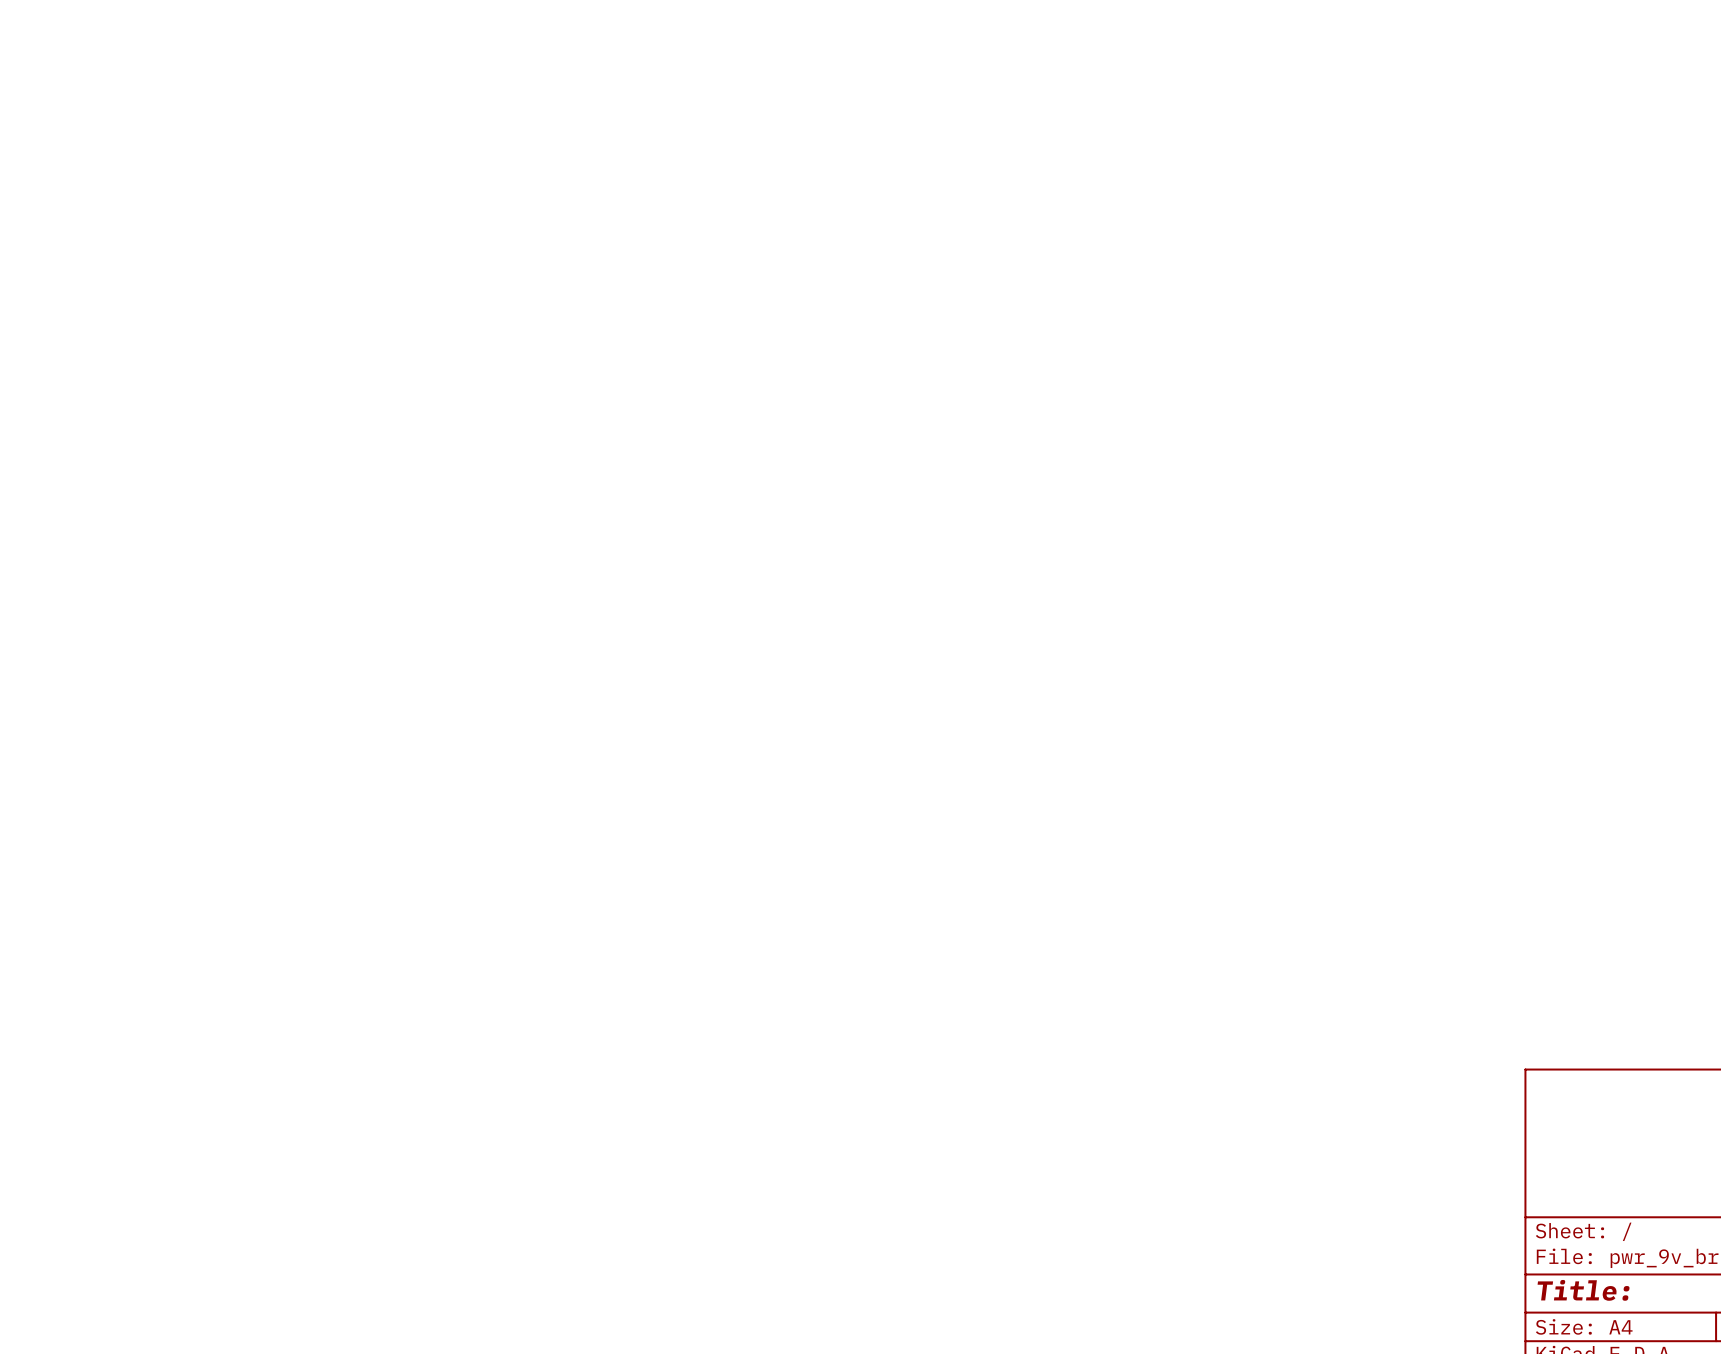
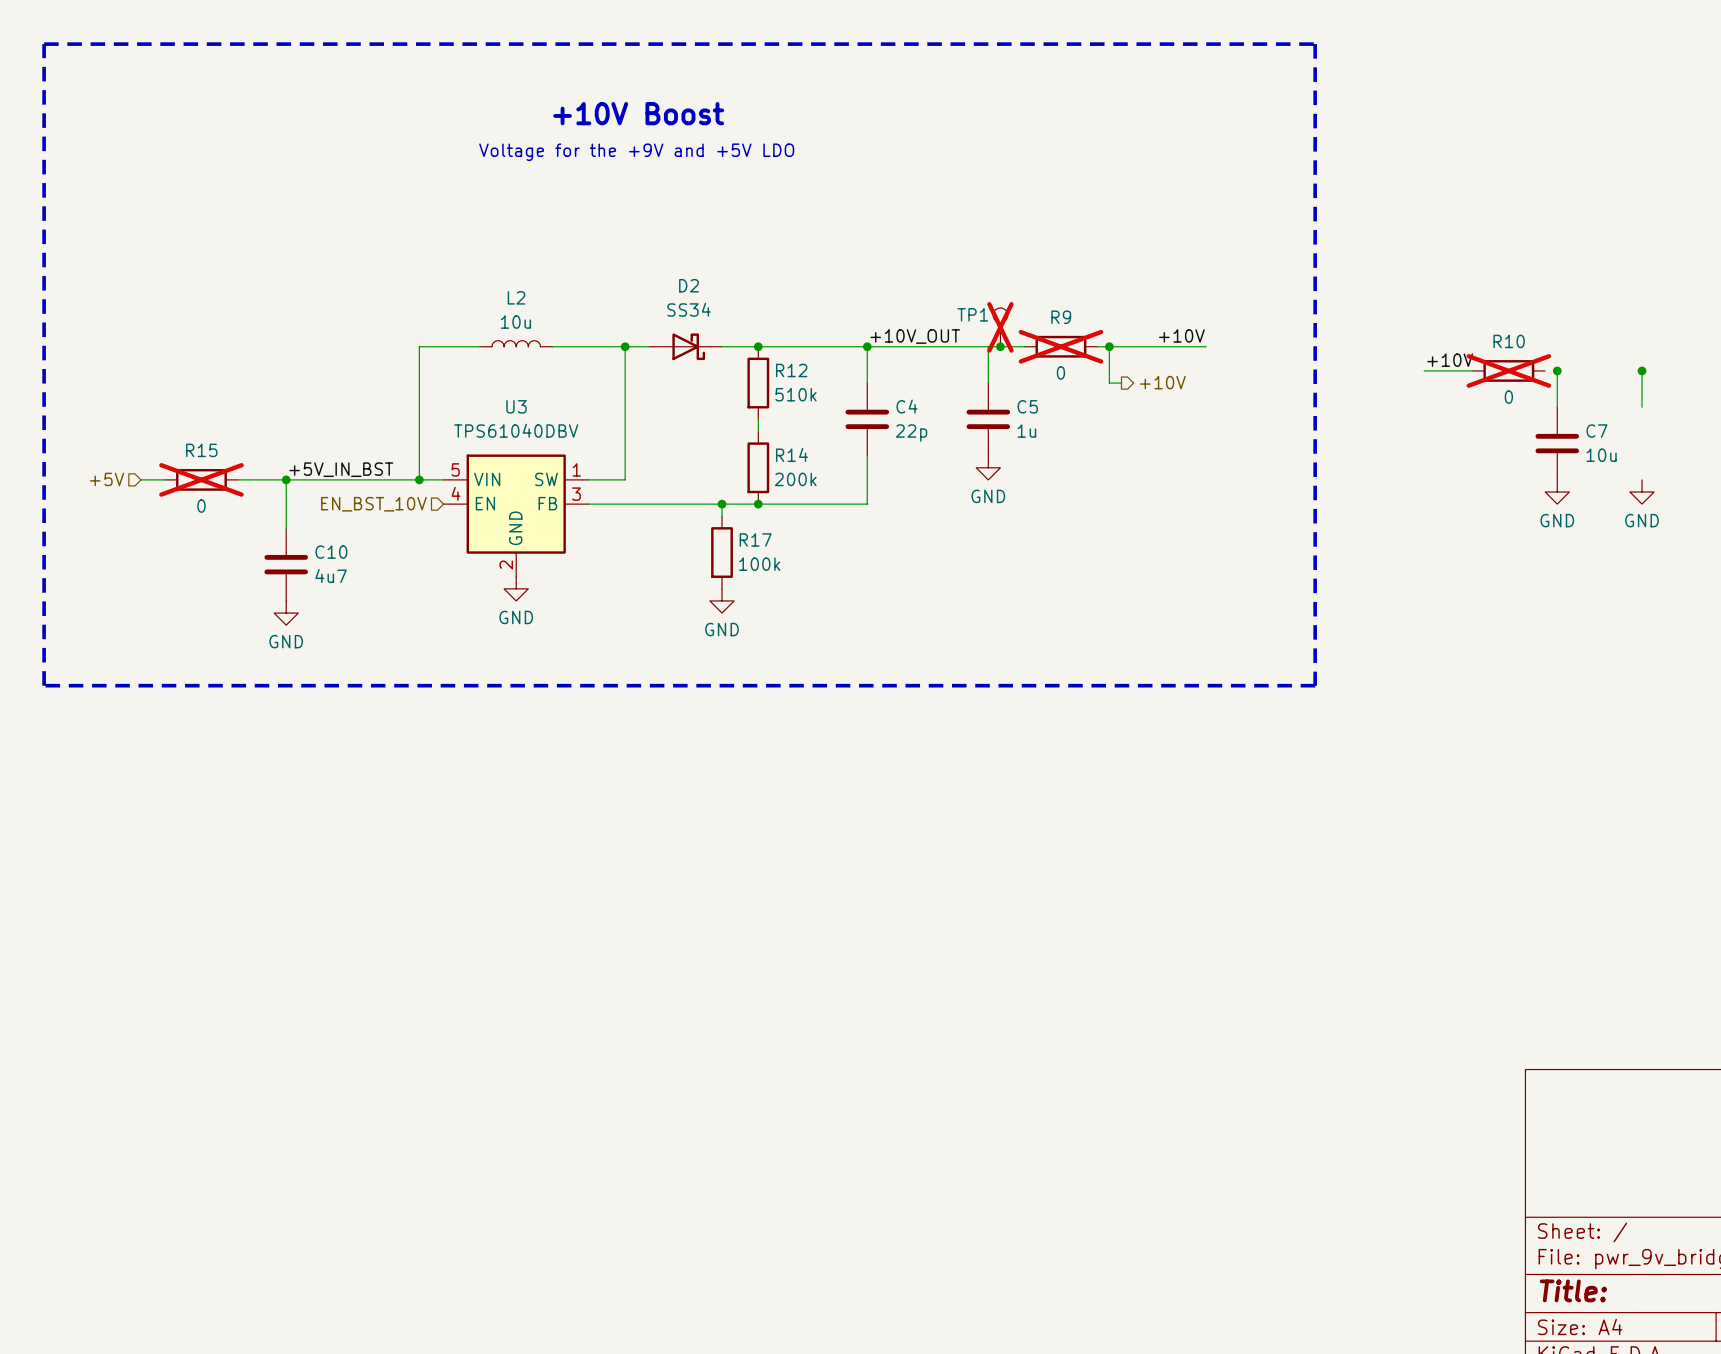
line: none -> (44, 44) (1315, 44) (1315, 685) (44, 685) (44, 44)
text: none -> +10V Boost (638, 113)
text: none -> Voltage for the +9V and +5V LDO (636, 152)
TP1: none -> (1000, 327)
label: none -> +10V (1181, 335)
label: none -> +10V_OUT (915, 336)
L2: none -> 10u (516, 343)
wire: none -> (479, 346) (419, 346) (419, 479)
wire: none -> (552, 346) (649, 346)
wire: none -> (625, 346) (625, 479) (588, 479)
junction: none -> (625, 346)
D2: none -> SS34 (685, 346)
wire: none -> (722, 346) (1024, 346)
junction: none -> (758, 346)
wire: none -> (867, 346) (867, 383)
junction: none -> (867, 346)
wire: none -> (988, 346) (988, 383)
junction: none -> (1000, 346)
R9: none -> 0 (1060, 346)
wire: none -> (1097, 346) (1206, 346)
wire: none -> (1109, 346) (1109, 383) (1121, 383)
junction: none -> (1109, 346)
label: none -> +10V (1450, 360)
wire: none -> (1424, 370) (1472, 370)
R10: none -> 0 (1508, 370)
wire: none -> (1557, 370) (1557, 407)
junction: none -> (1557, 370)
wire: none -> (1642, 370) (1642, 407)
junction: none -> (1642, 370)
hierarchical label: none -> +10V (1162, 382)
R12: none -> 510k (758, 383)
wire: none -> (758, 419) (758, 431)
C4: none -> 22p (867, 419)
C5: none -> 1u (988, 419)
C7: none -> 10u (1557, 443)
wire: none -> (867, 455) (867, 504) (588, 504)
R14: none -> 200k (758, 467)
power symbol: none -> GND (988, 467)
label: none -> +5V_IN_BST (341, 469)
hierarchical label: none -> +5V (107, 479)
wire: none -> (140, 479) (165, 479)
R15: none -> 0 (201, 479)
wire: none -> (237, 479) (443, 479)
wire: none -> (286, 479) (286, 528)
junction: none -> (286, 479)
junction: none -> (419, 479)
power symbol: none -> GND (1557, 492)
power symbol: none -> GND (1642, 492)
wire: none -> (722, 504) (722, 516)
junction: none -> (722, 504)
junction: none -> (758, 504)
hierarchical label: none -> EN_BST_10V (373, 504)
U3: none -> TPS61040DBV (516, 515)
R17: none -> 100k (722, 552)
C10: none -> 4u7 (286, 564)
power symbol: none -> GND (516, 588)
power symbol: none -> GND (722, 600)
power symbol: none -> GND (286, 613)

